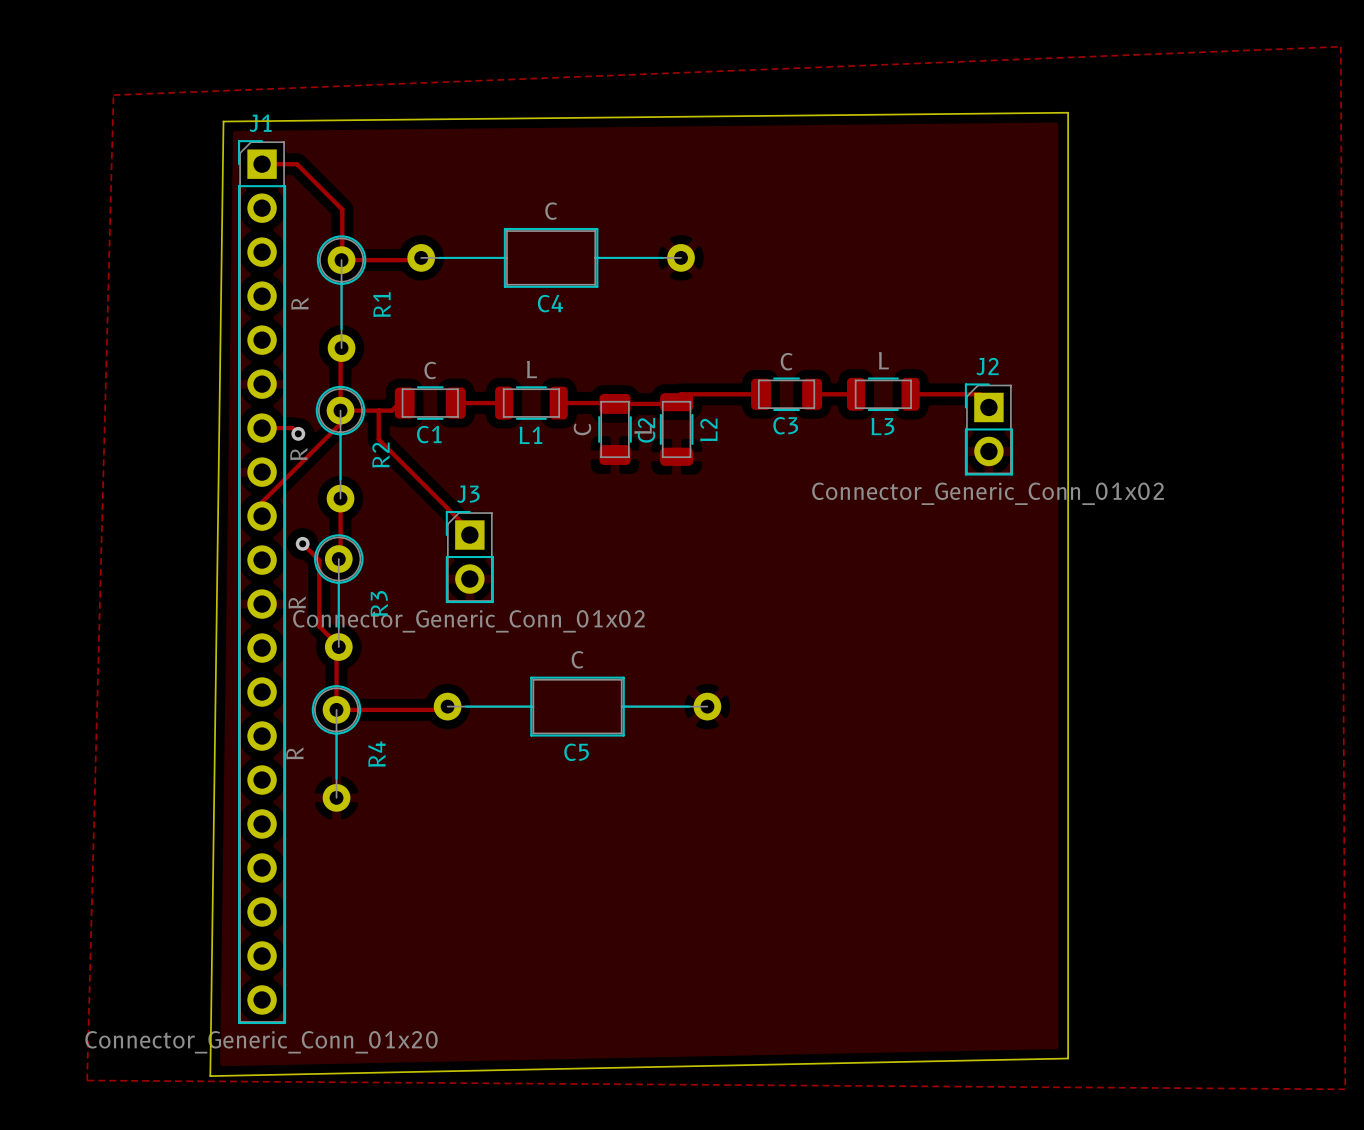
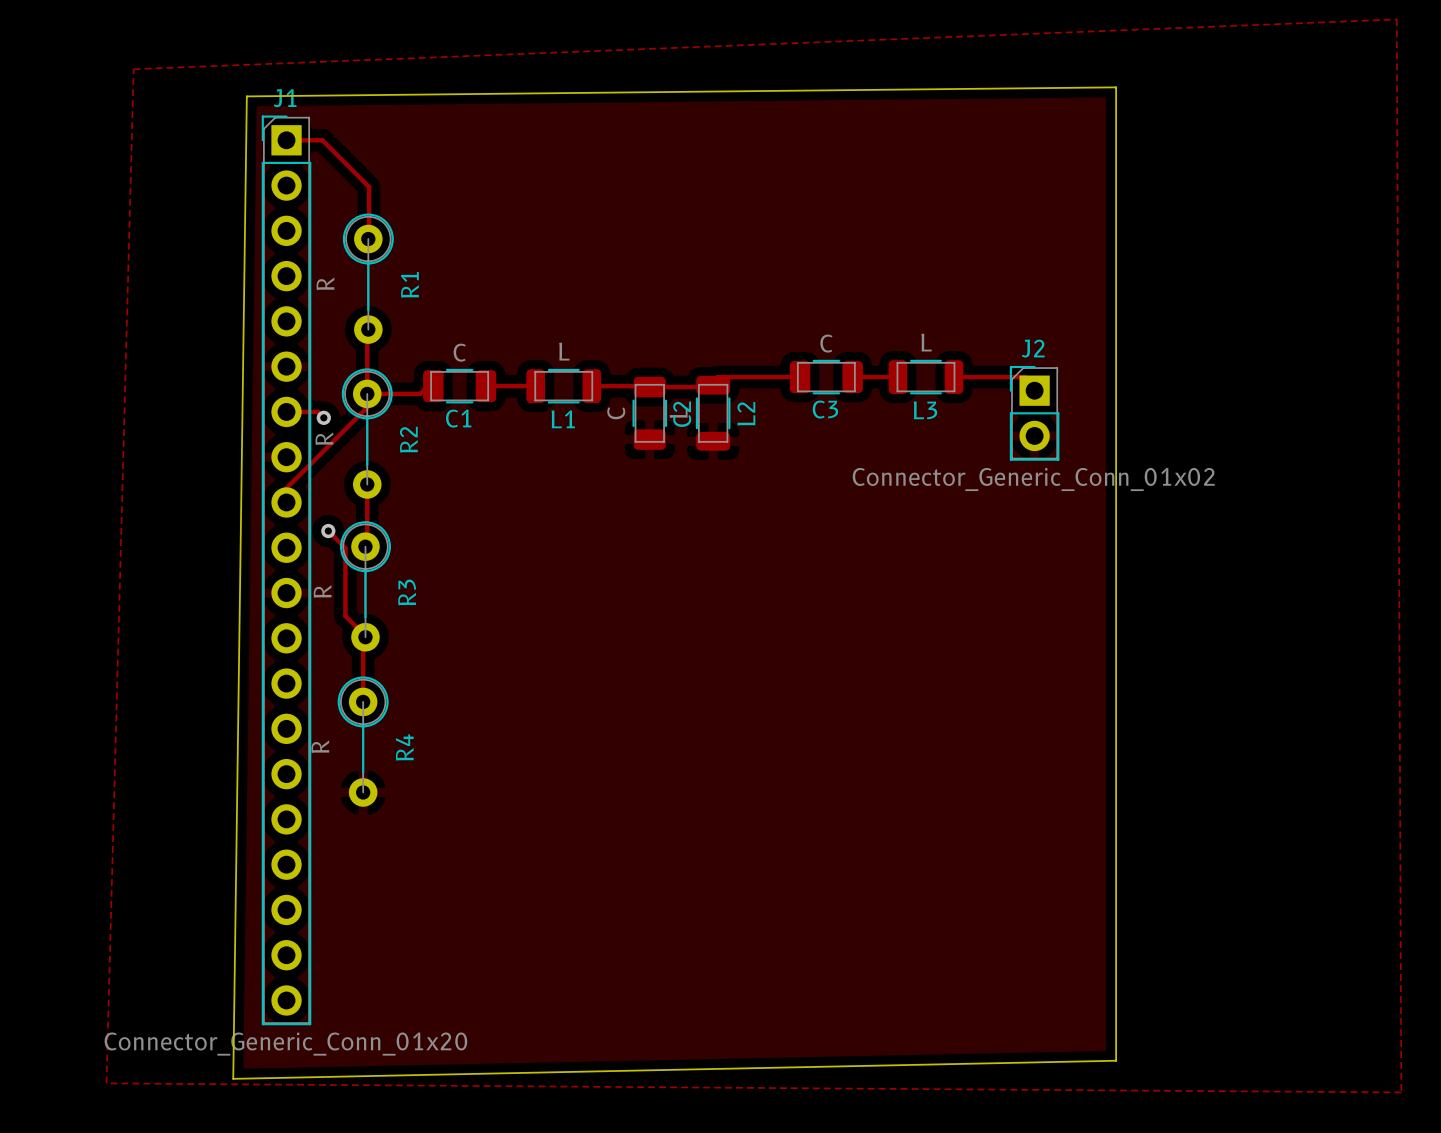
track: (421, 257) (419, 260) (341, 260) -> none
C4: C (551, 257) -> none
track: (378, 410) (378, 439) (469, 530) (469, 535) -> none
J3: Connector_Generic_Conn_01x02 (469, 557) -> none
track: (447, 706) (444, 709) (336, 709) -> none
C5: C (577, 706) -> none

